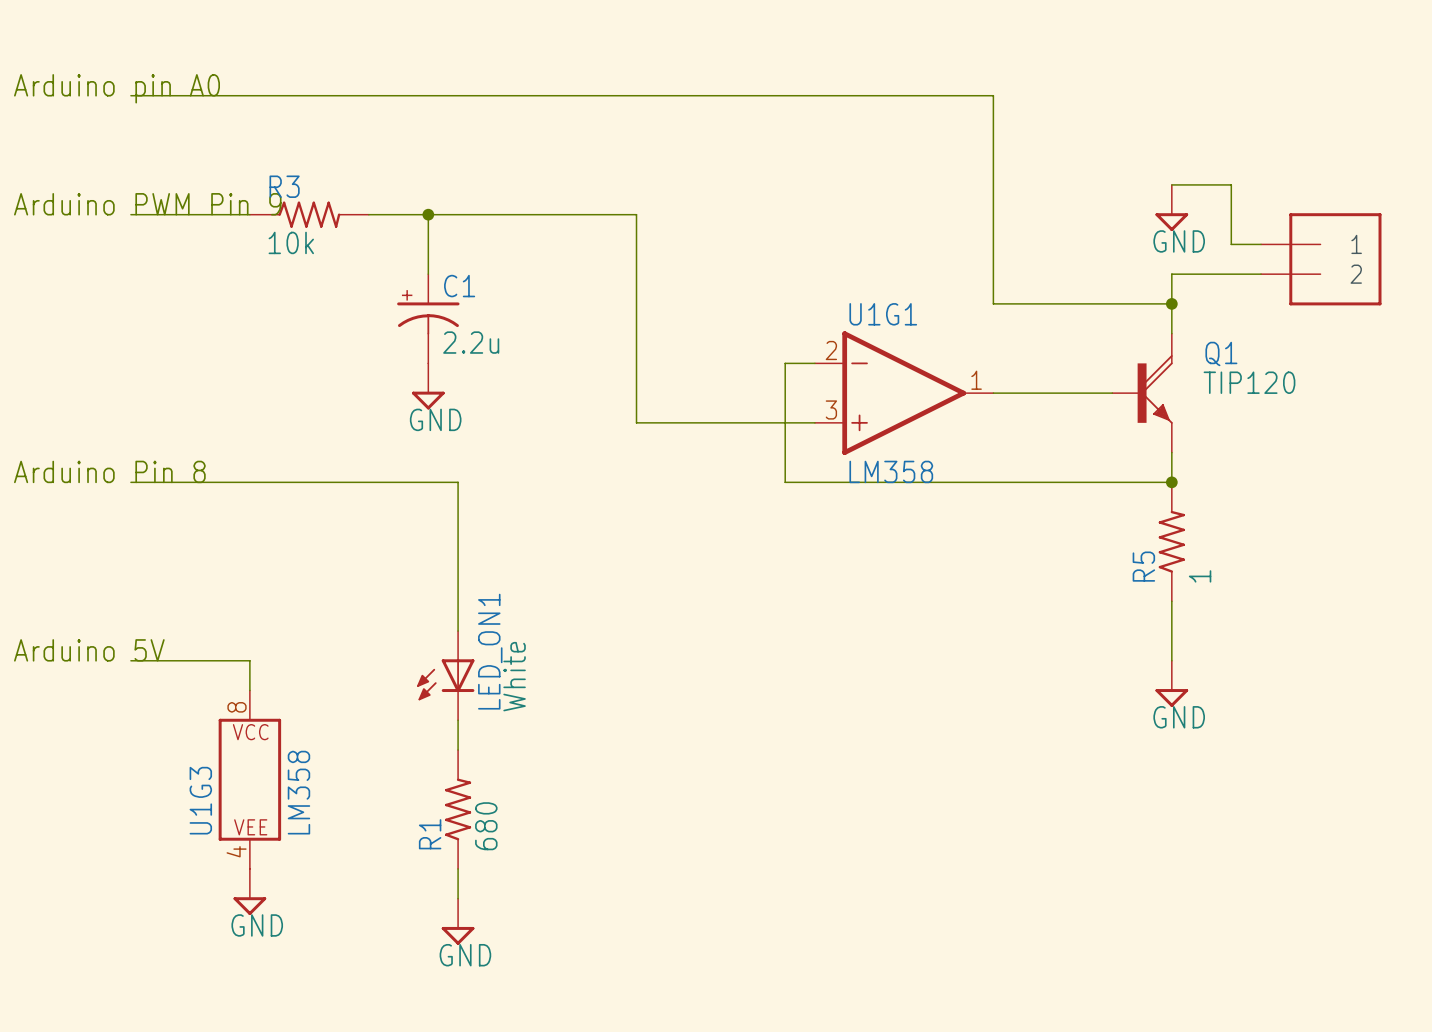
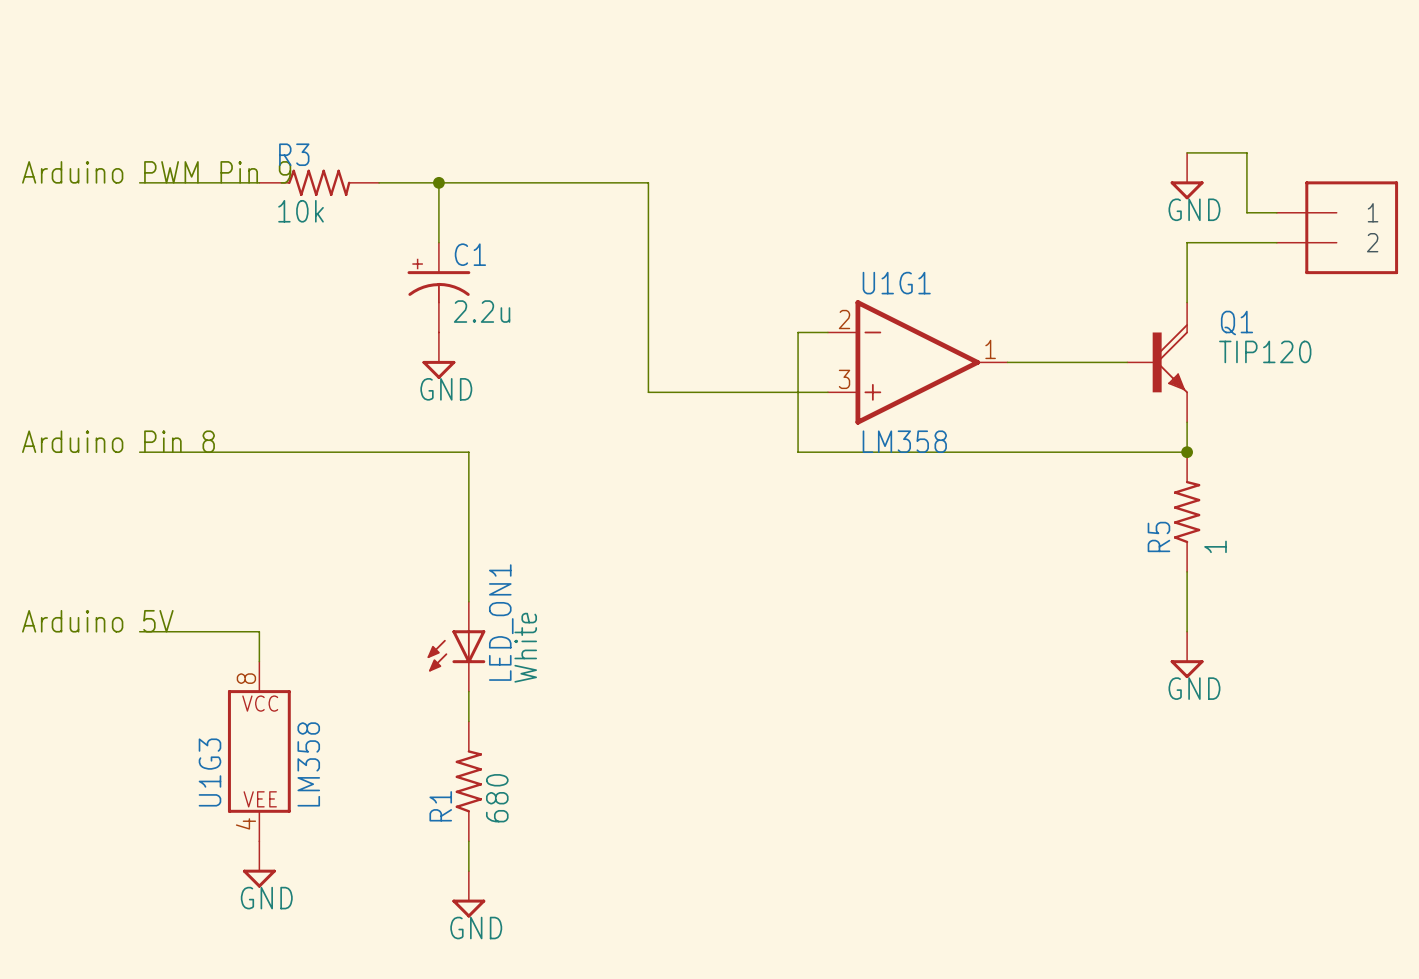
text: Arduino pin A0 (117, 88) -> none
wire: (130, 95) (993, 95) (993, 303) (1171, 303) -> none
junction: (1171, 303) -> none

